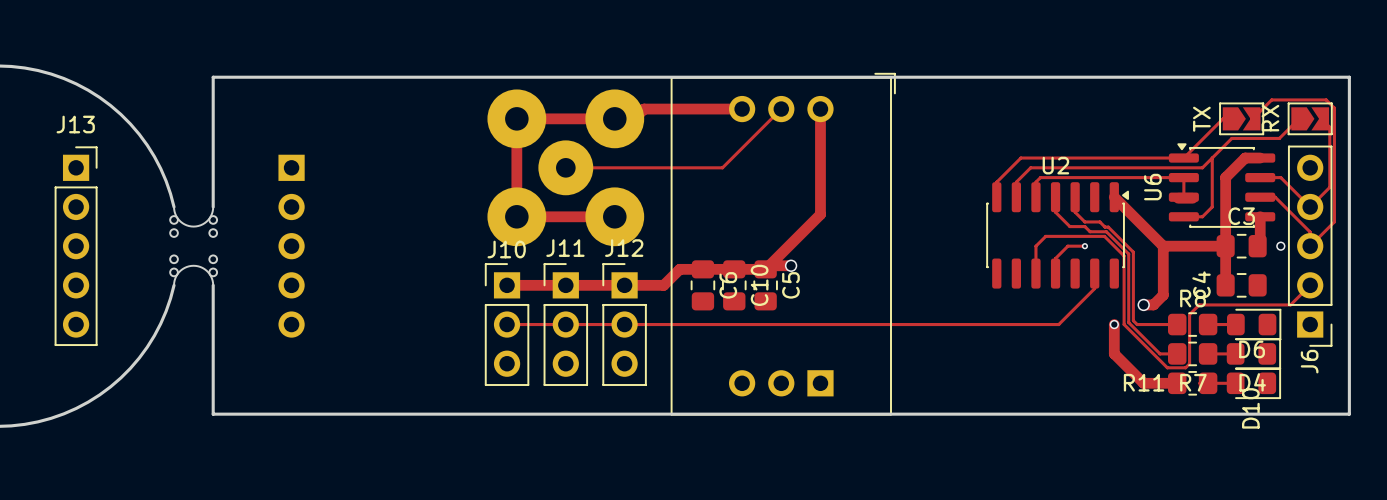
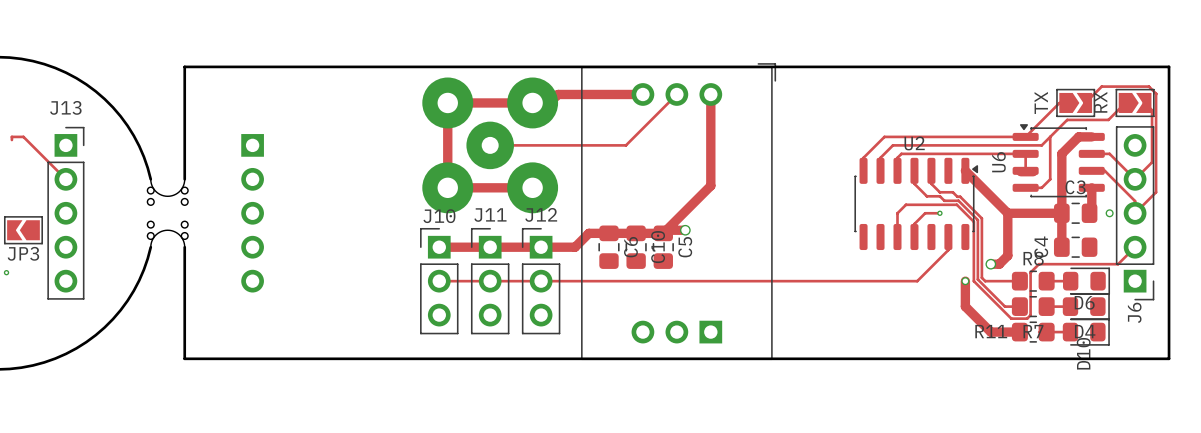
track: none -> (11, 140) (11, 136) (23, 136) (65, 179)
JP3: none -> (23, 230)
via: none -> (6, 272)

